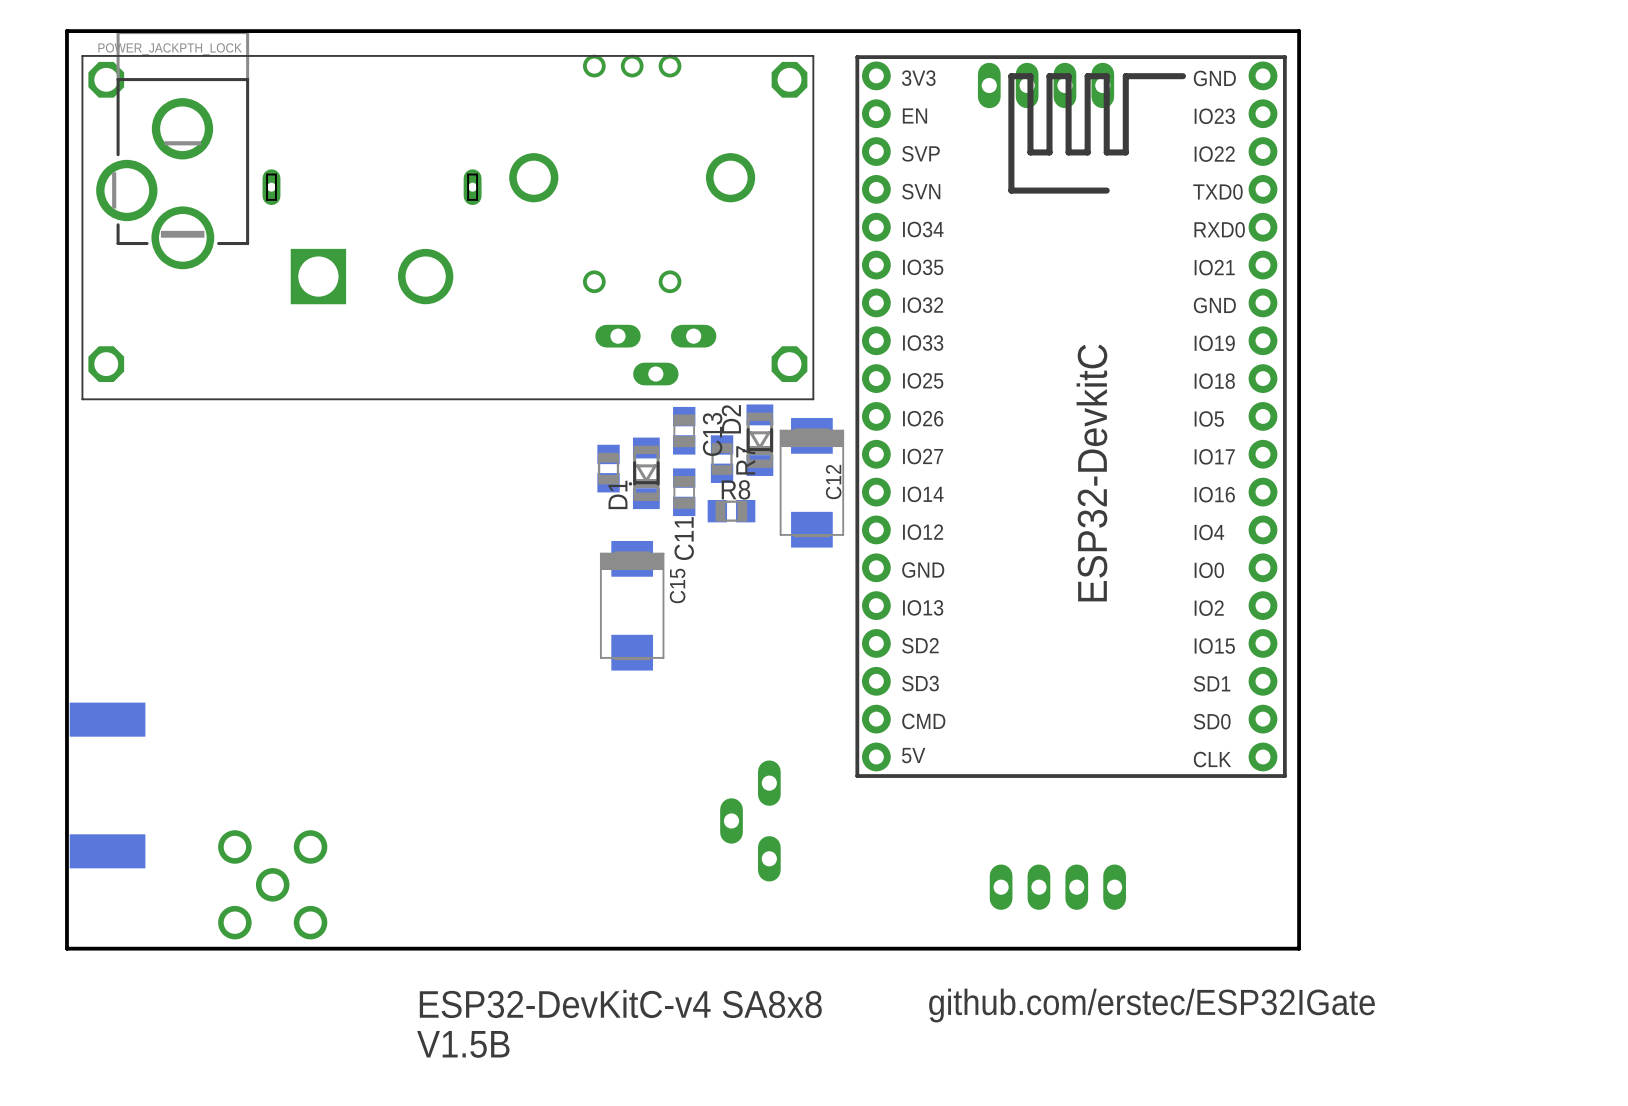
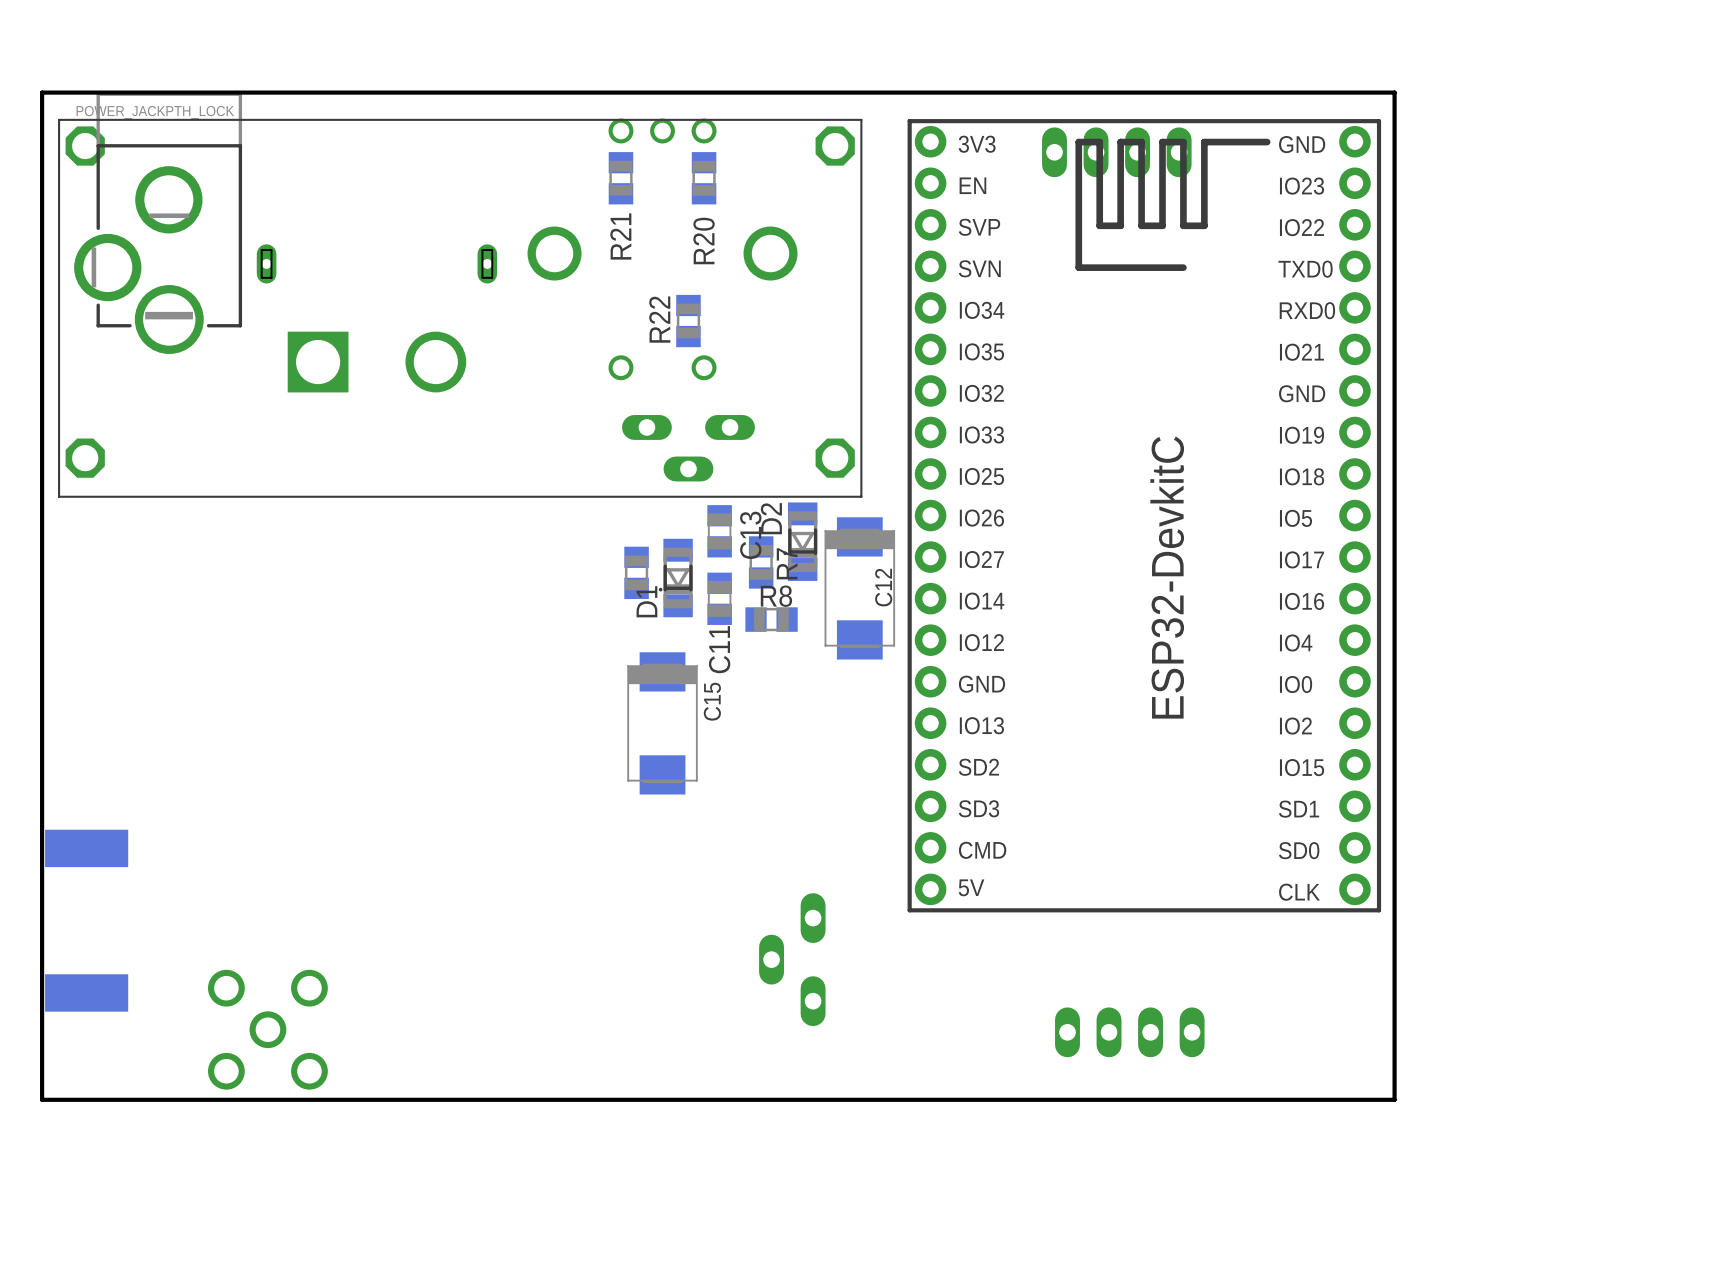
R21: none -> (620, 178)
R20: none -> (704, 178)
R22: none -> (688, 321)
text: ESP32-DevKitC-v4 SA8x8 (620, 1003) -> none
text: github.com/erstec/ESP32IGate (1152, 1005) -> none
text: V1.5B (463, 1044) -> none

